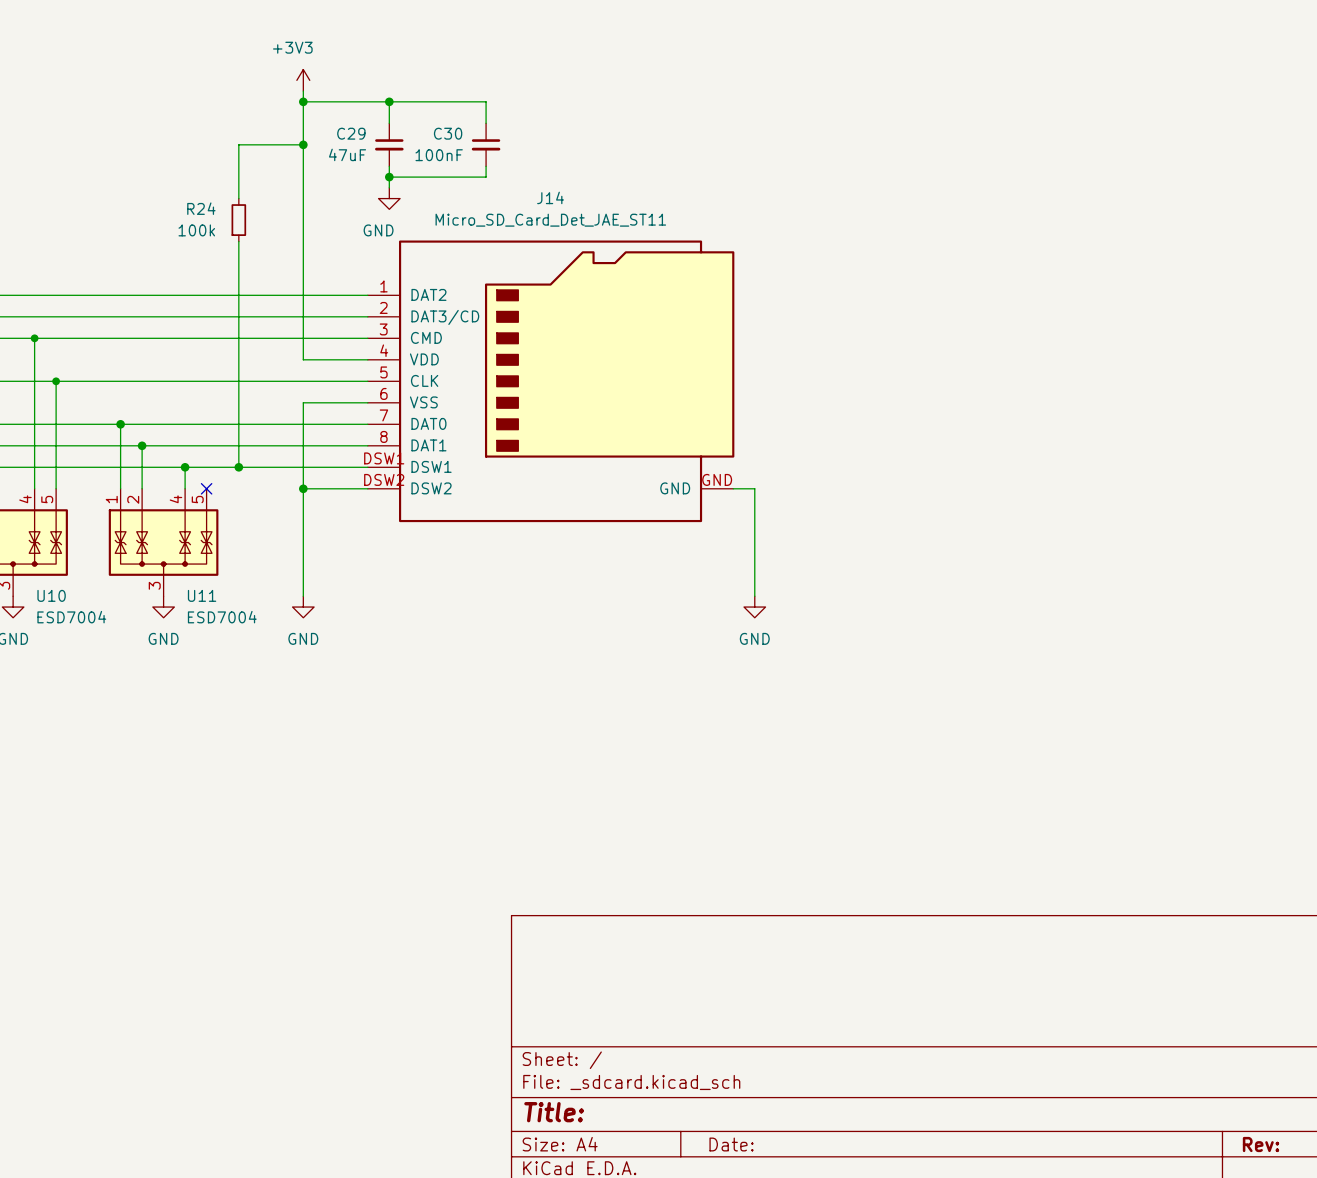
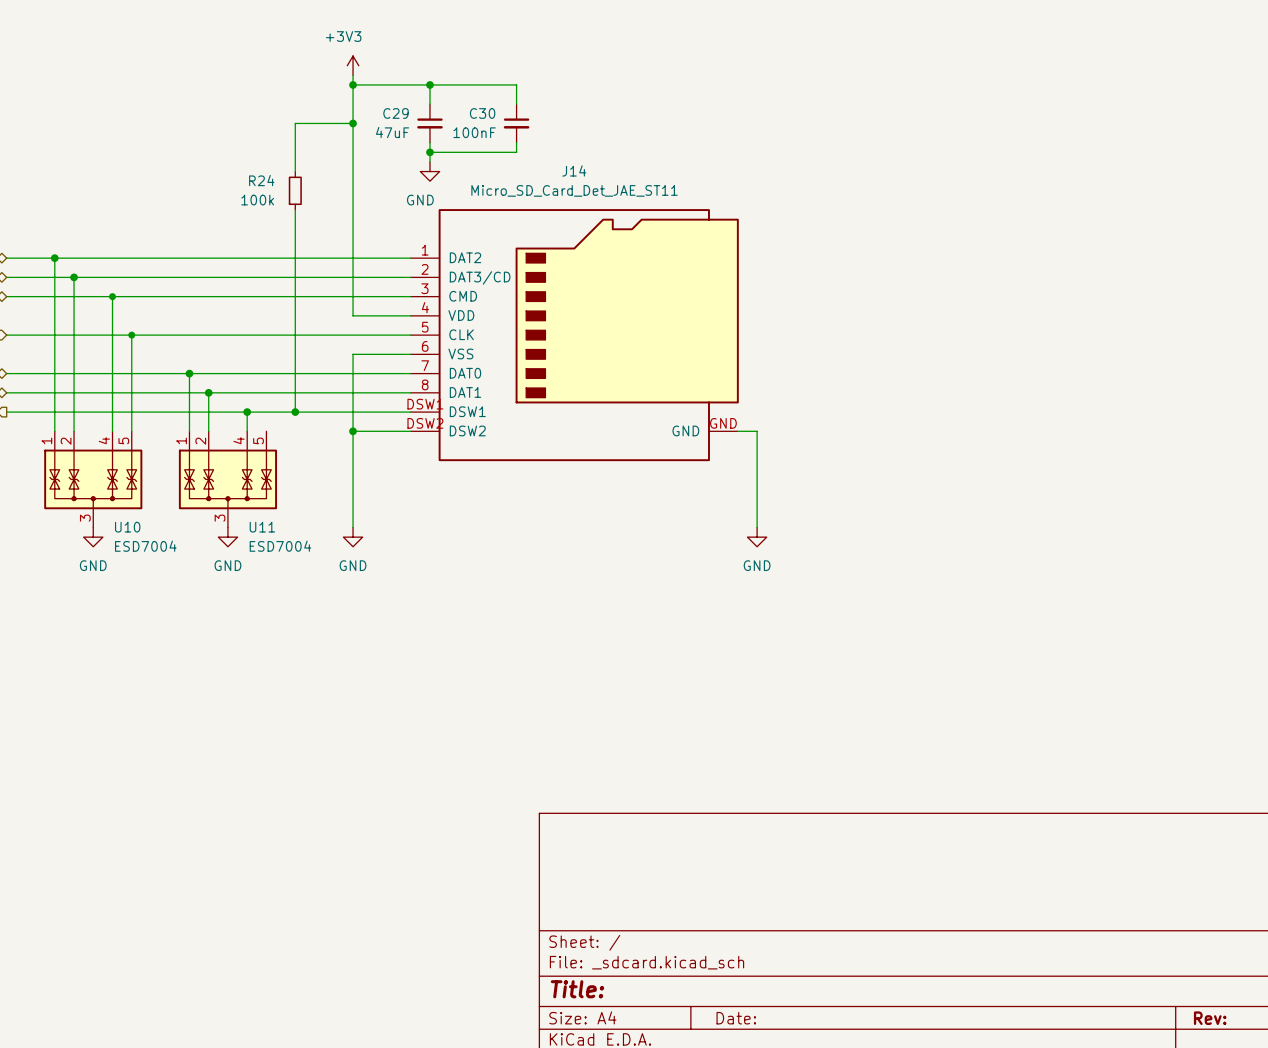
no-connect mark: (206, 488) -> none

